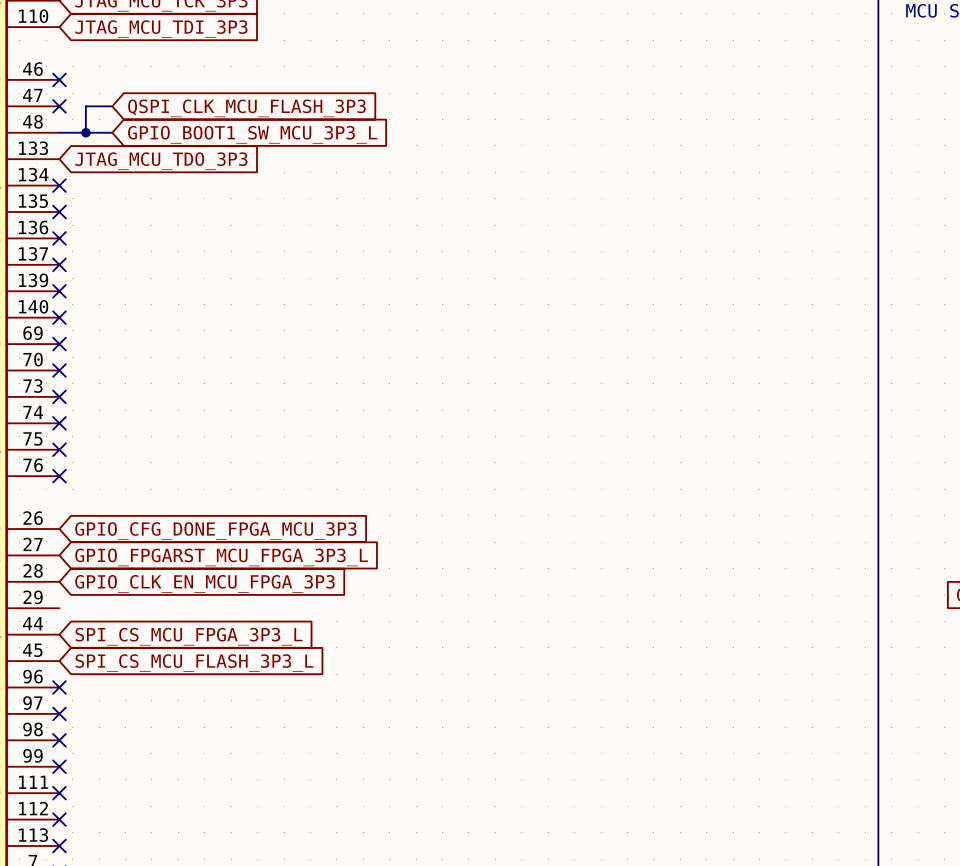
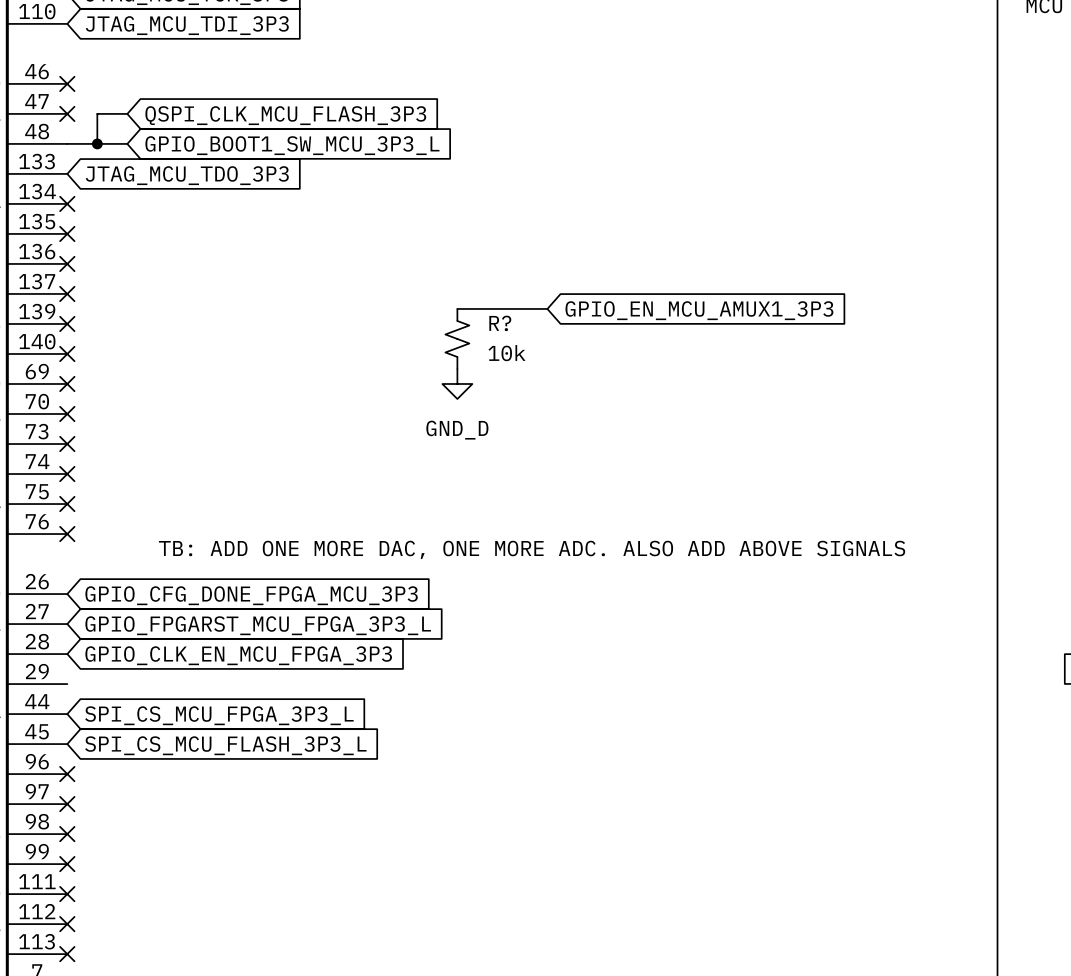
wire: none -> (457, 308) (547, 308)
global label: none -> GPIO_EN_MCU_AMUX1_3P3 (699, 310)
R?: none -> 10k (457, 338)
power symbol: none -> GND_D (457, 383)
text: none -> TB: ADD ONE MORE DAC, ONE MORE ADC. ALSO ADD ABOVE SIGNALS (532, 549)

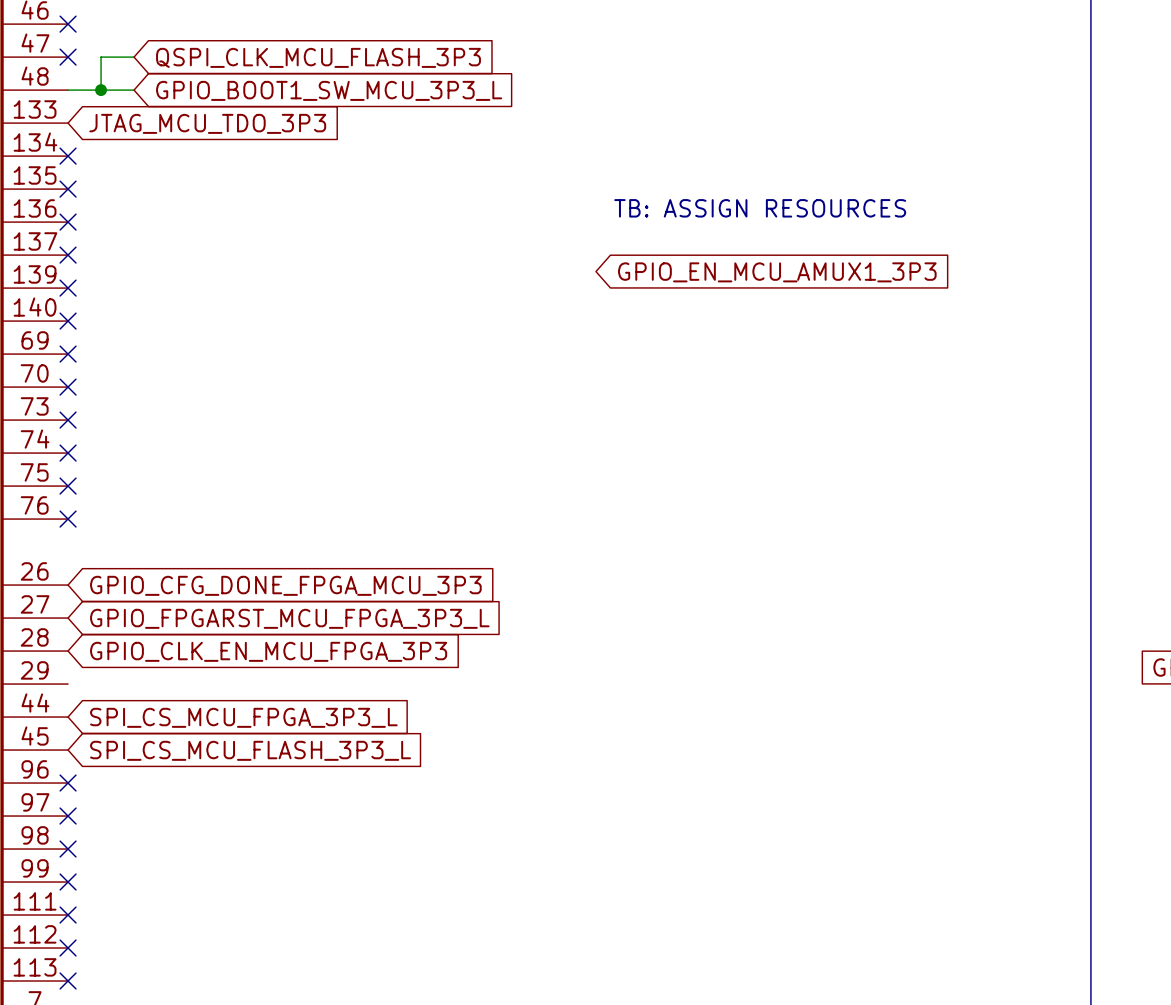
text: none -> TB: ASSIGN RESOURCES (760, 208)
wire: (457, 308) (547, 308) -> none
R?: 10k (457, 338) -> none
power symbol: GND_D (457, 383) -> none
text: TB: ADD ONE MORE DAC, ONE MORE ADC. ALSO ADD ABOVE SIGNALS (532, 549) -> none

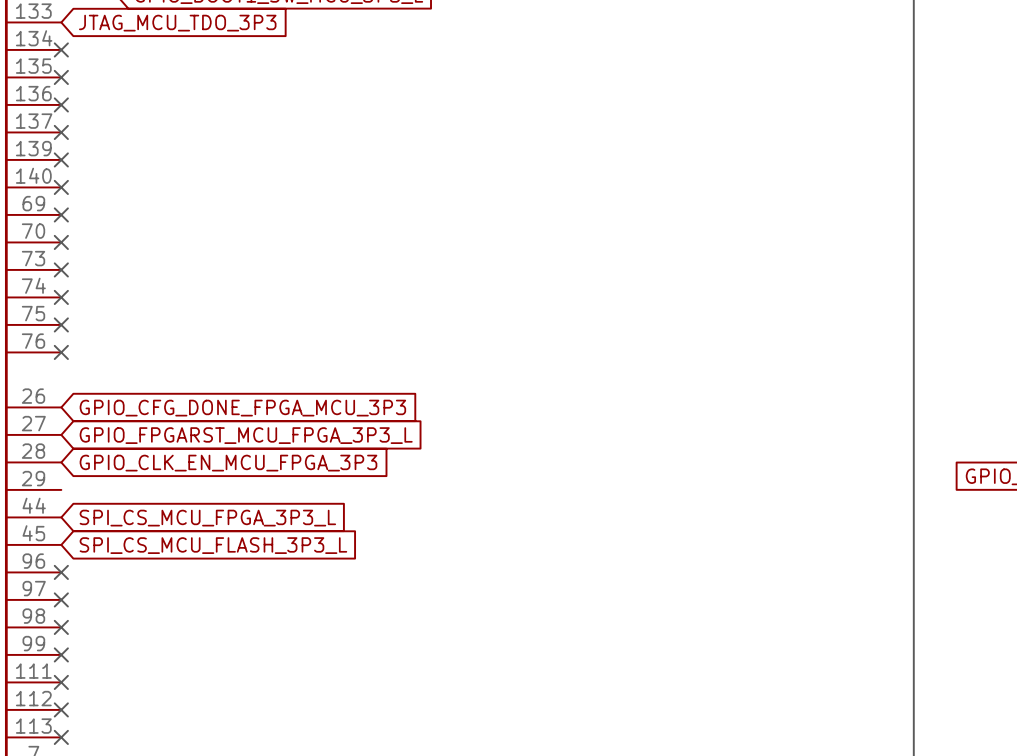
text: TB: ASSIGN RESOURCES (760, 208) -> none
global label: GPIO_EN_MCU_AMUX1_3P3 (777, 272) -> none

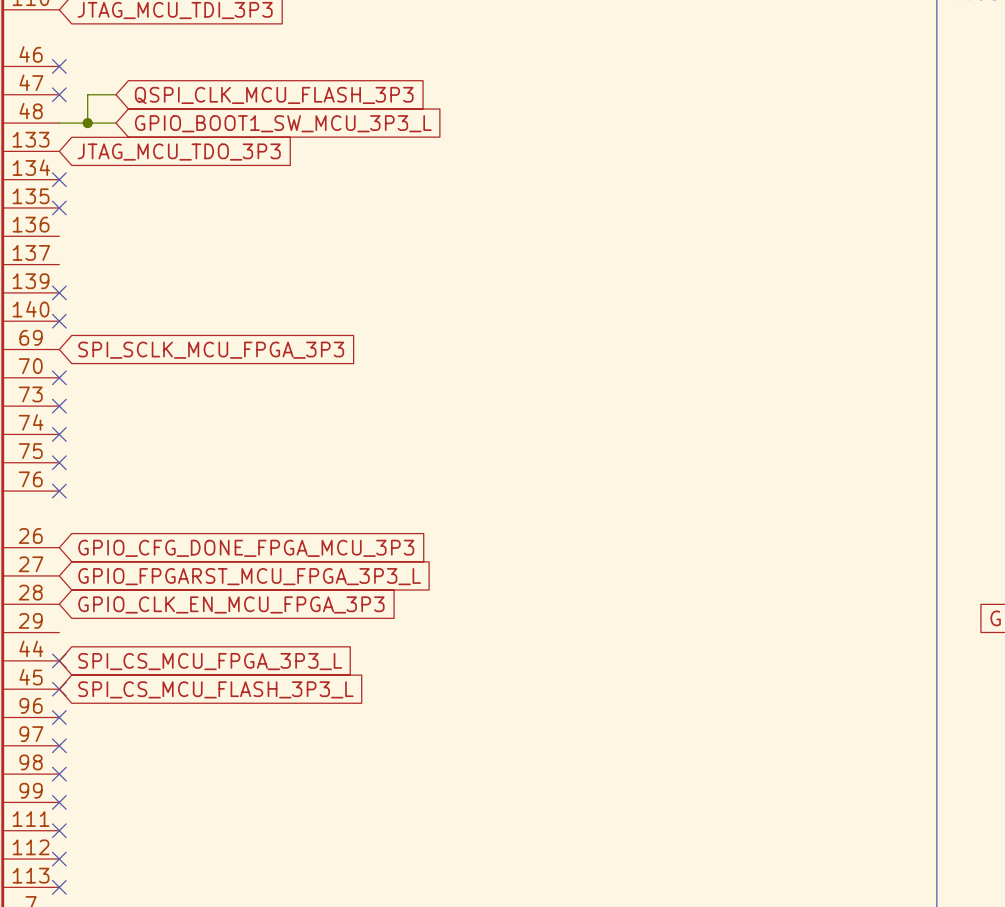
no-connect mark: (61, 104) -> none
no-connect mark: (61, 132) -> none
no-connect mark: (61, 214) -> none
global label: none -> SPI_SCLK_MCU_FPGA_3P3 (211, 350)
no-connect mark: none -> (59, 660)
no-connect mark: none -> (59, 689)

